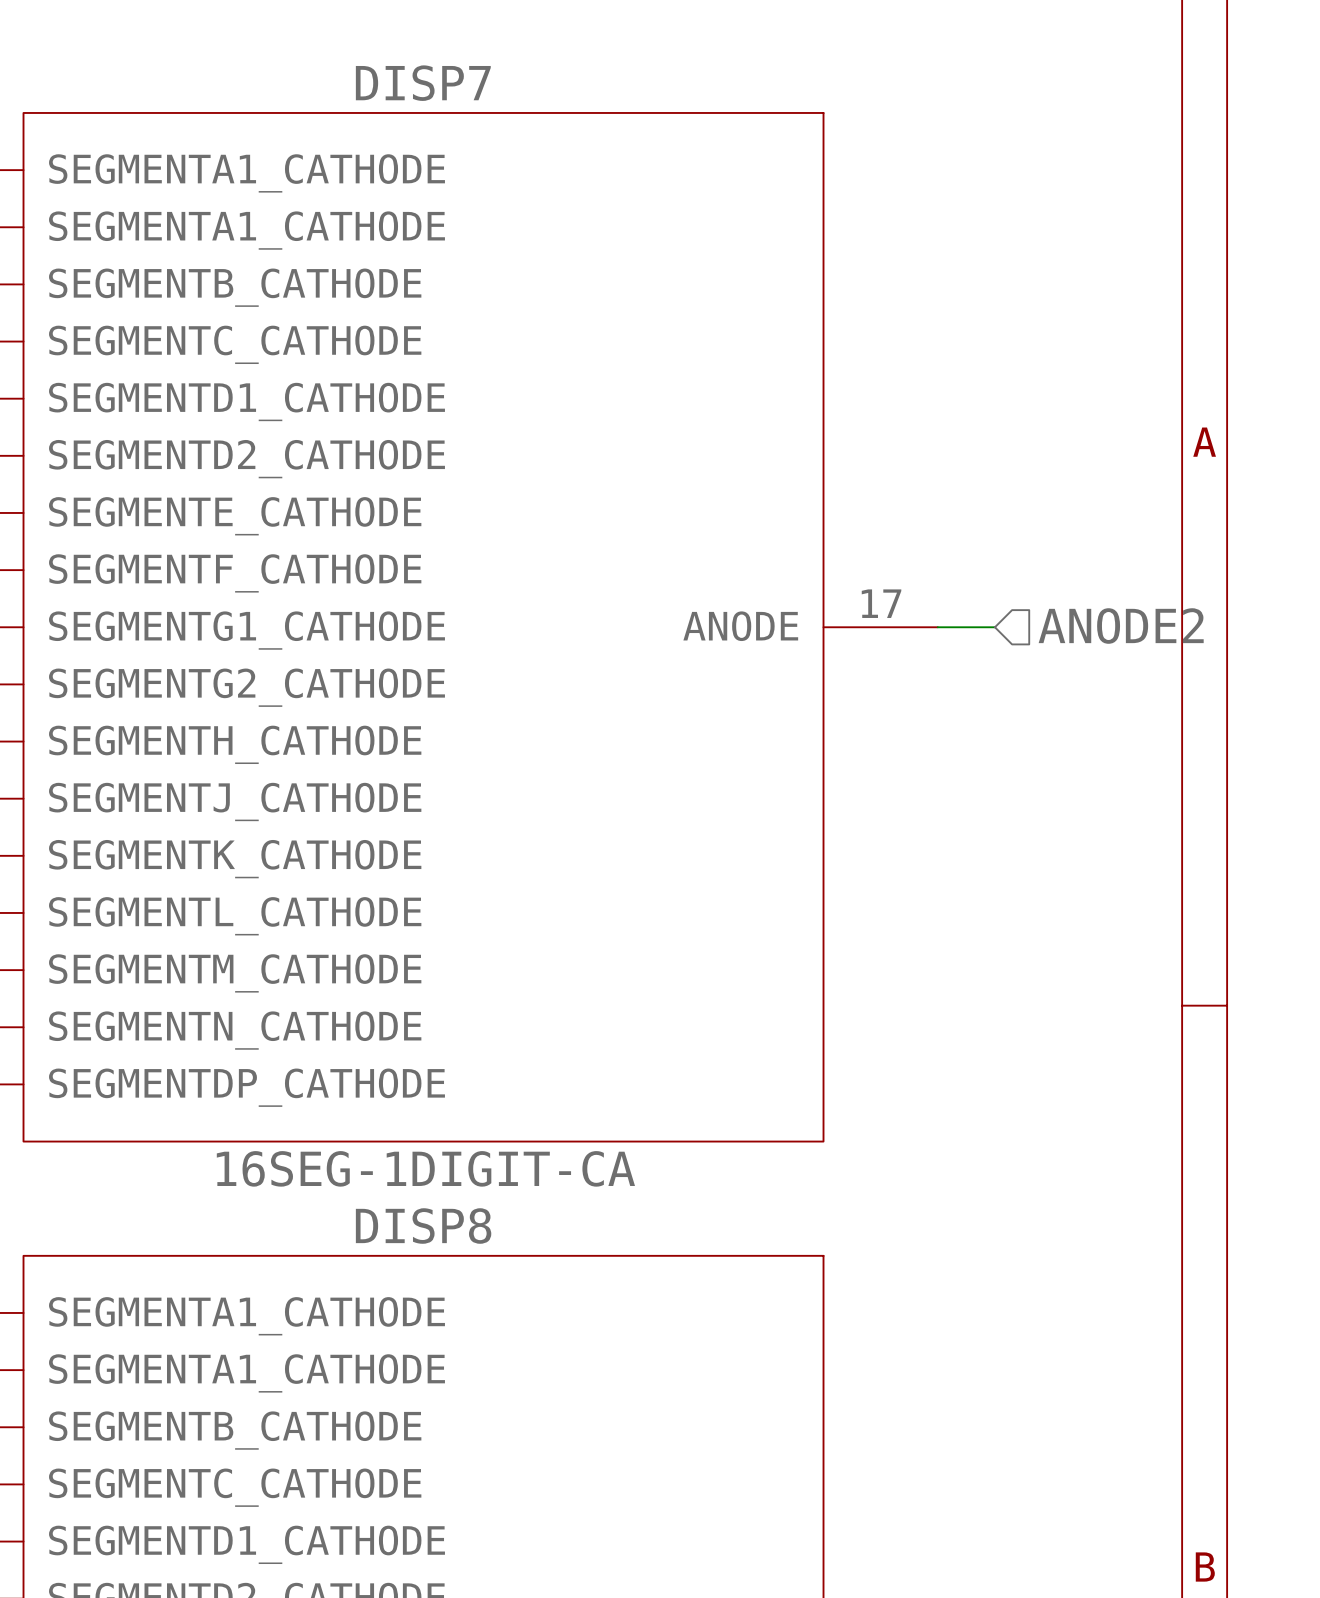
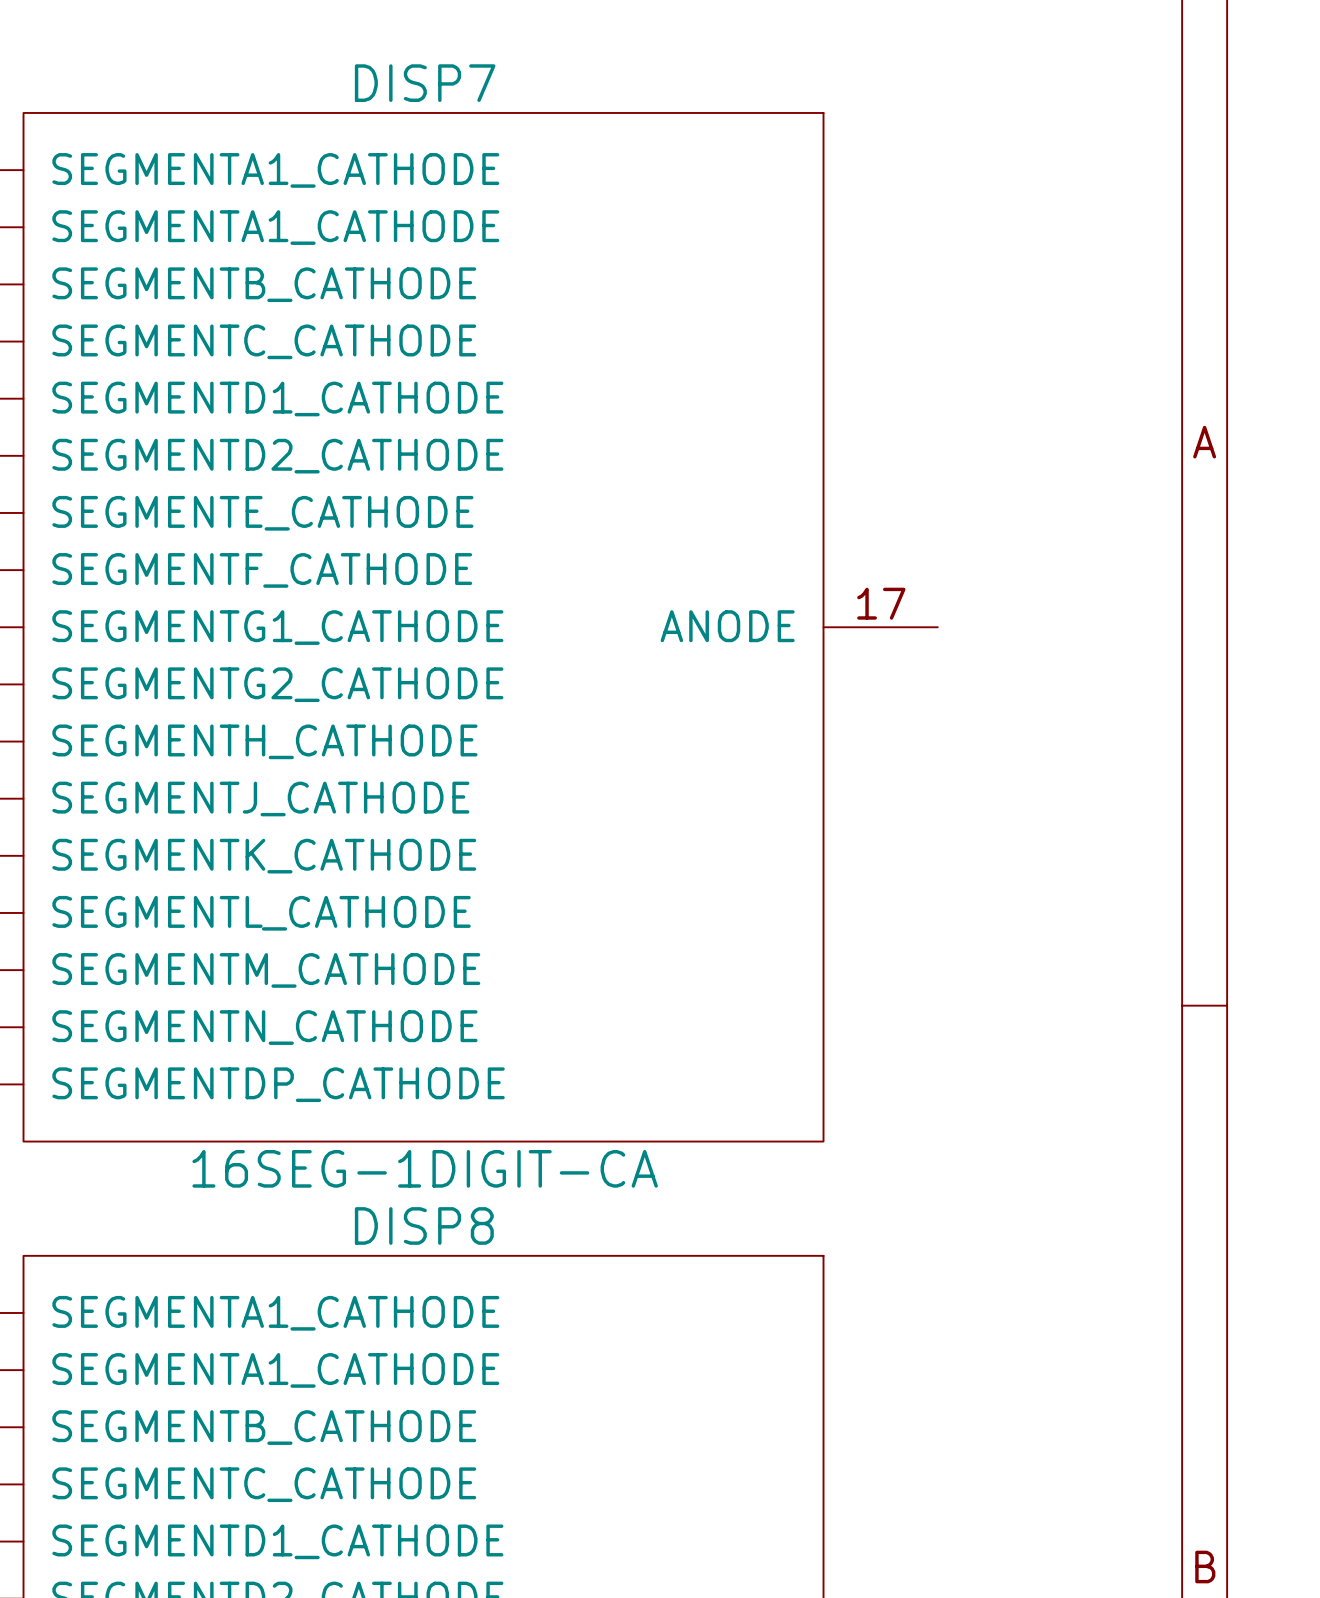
hierarchical label: ANODE2 (1121, 626) -> none
wire: (937, 627) (994, 627) -> none

